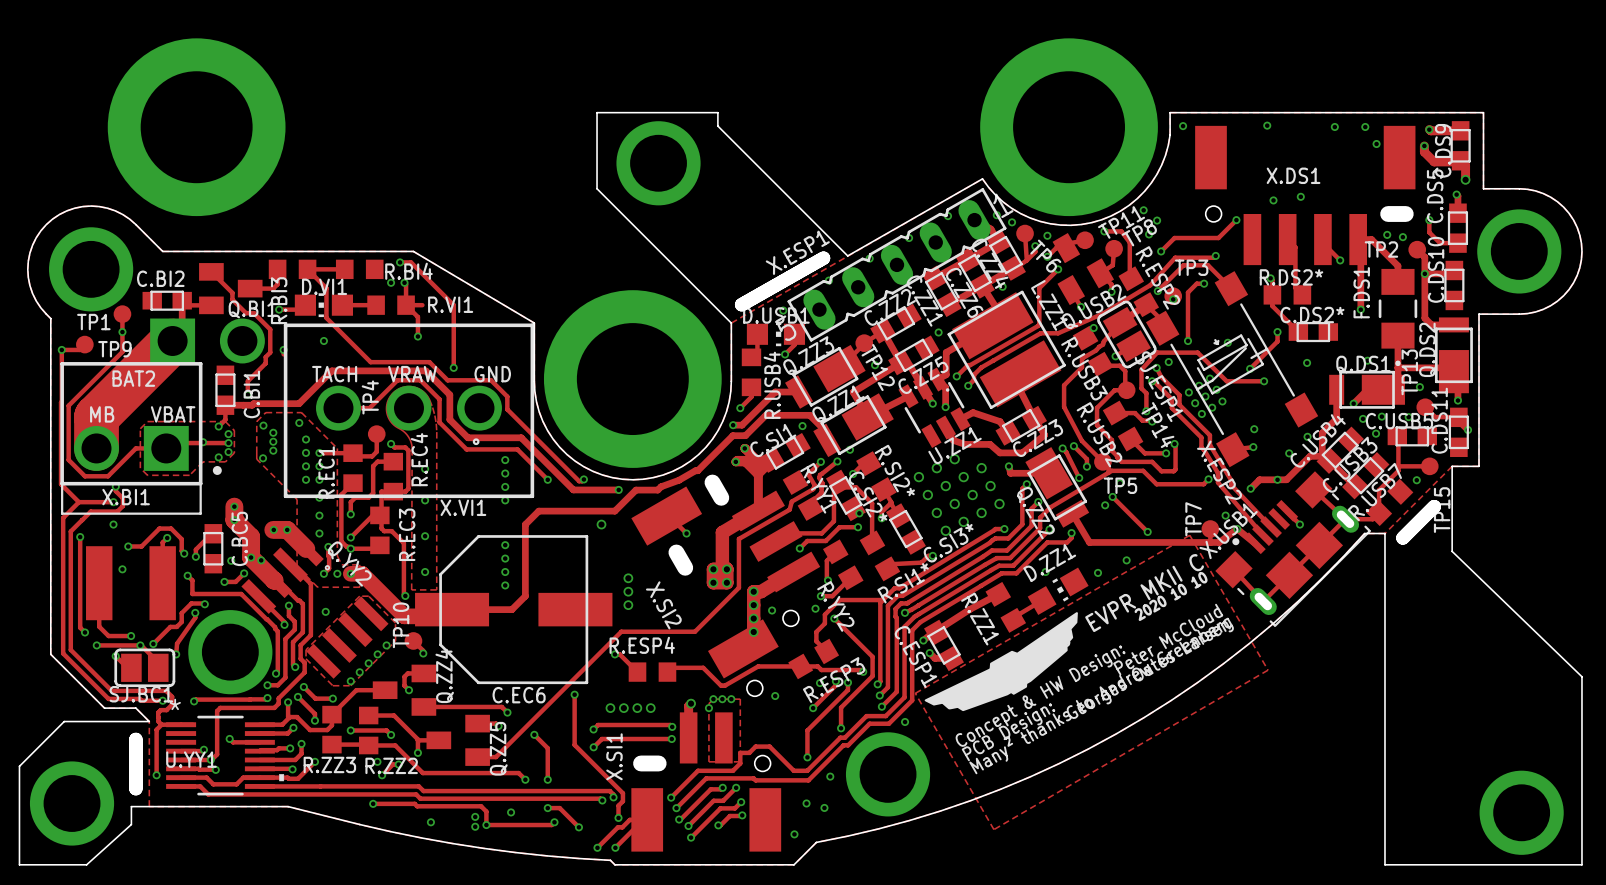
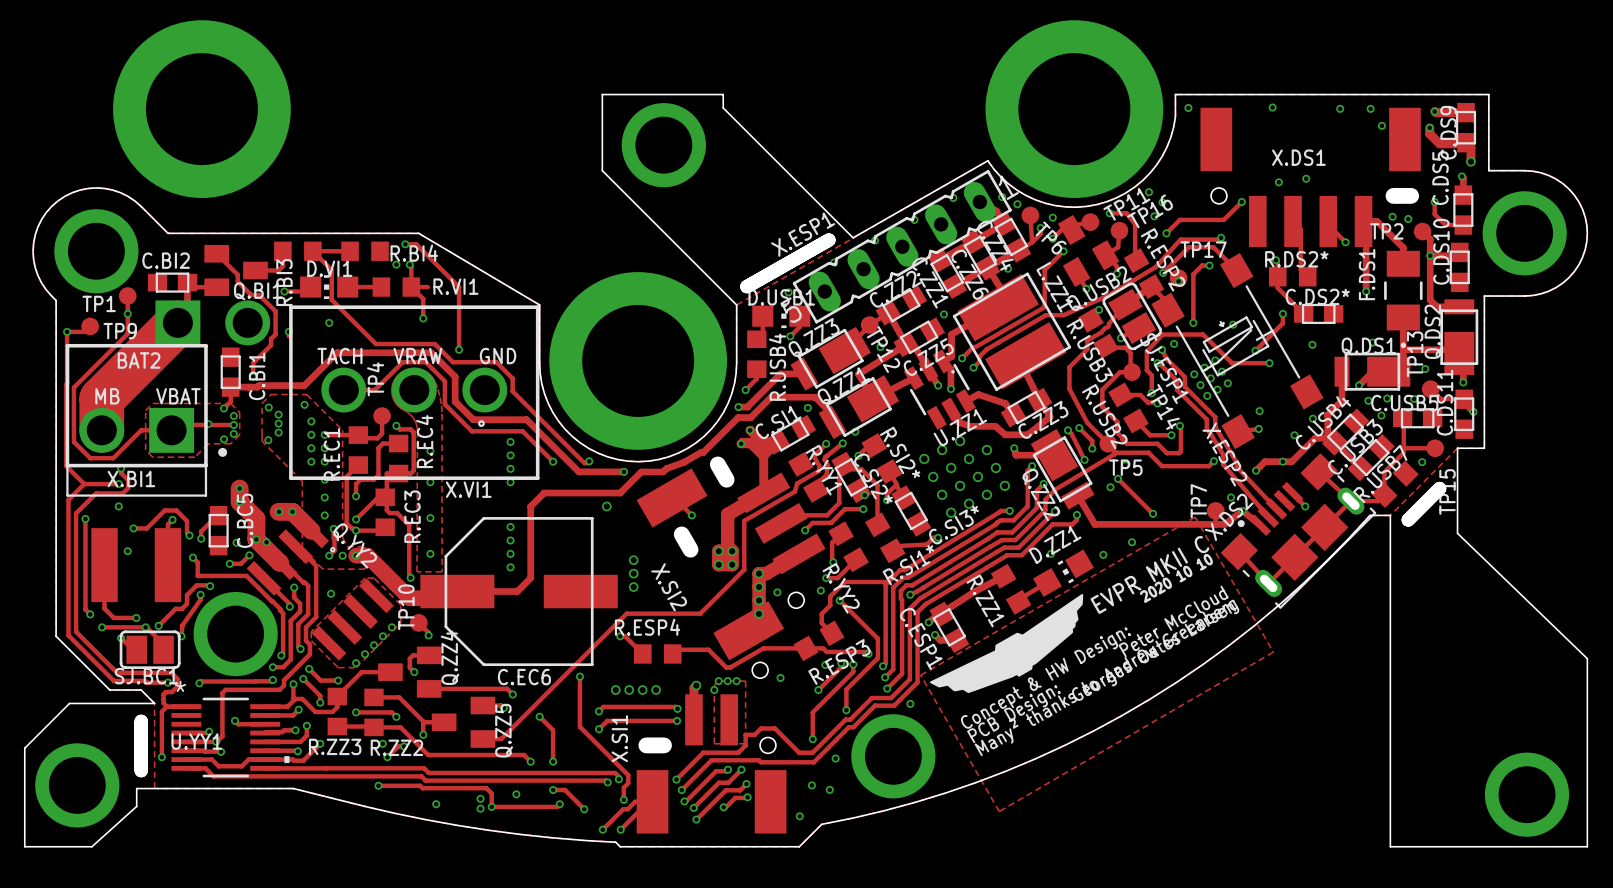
TP8 name: TP8 (1139, 232) -> TP16 (1150, 211)
TP3 name: TP3 (1191, 267) -> TP17 (1203, 249)
X.USB1 name: X.USB1 (1228, 531) -> X.DS2 (1229, 517)

